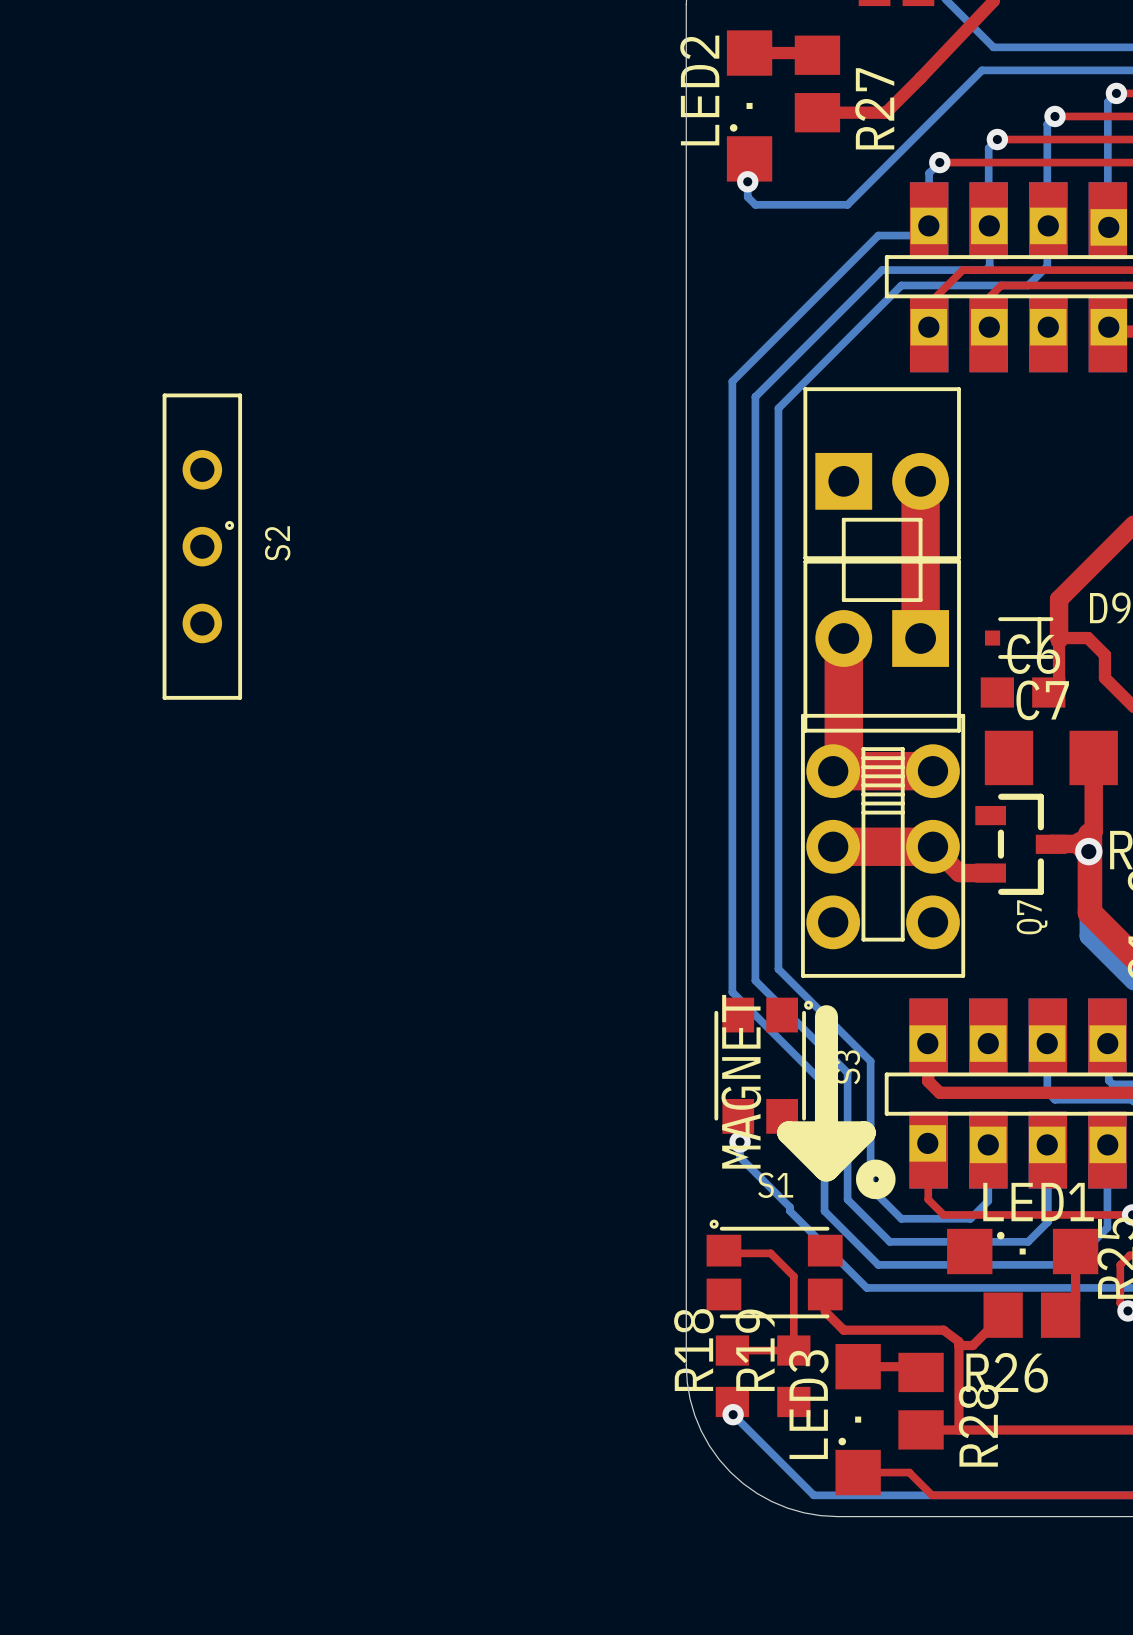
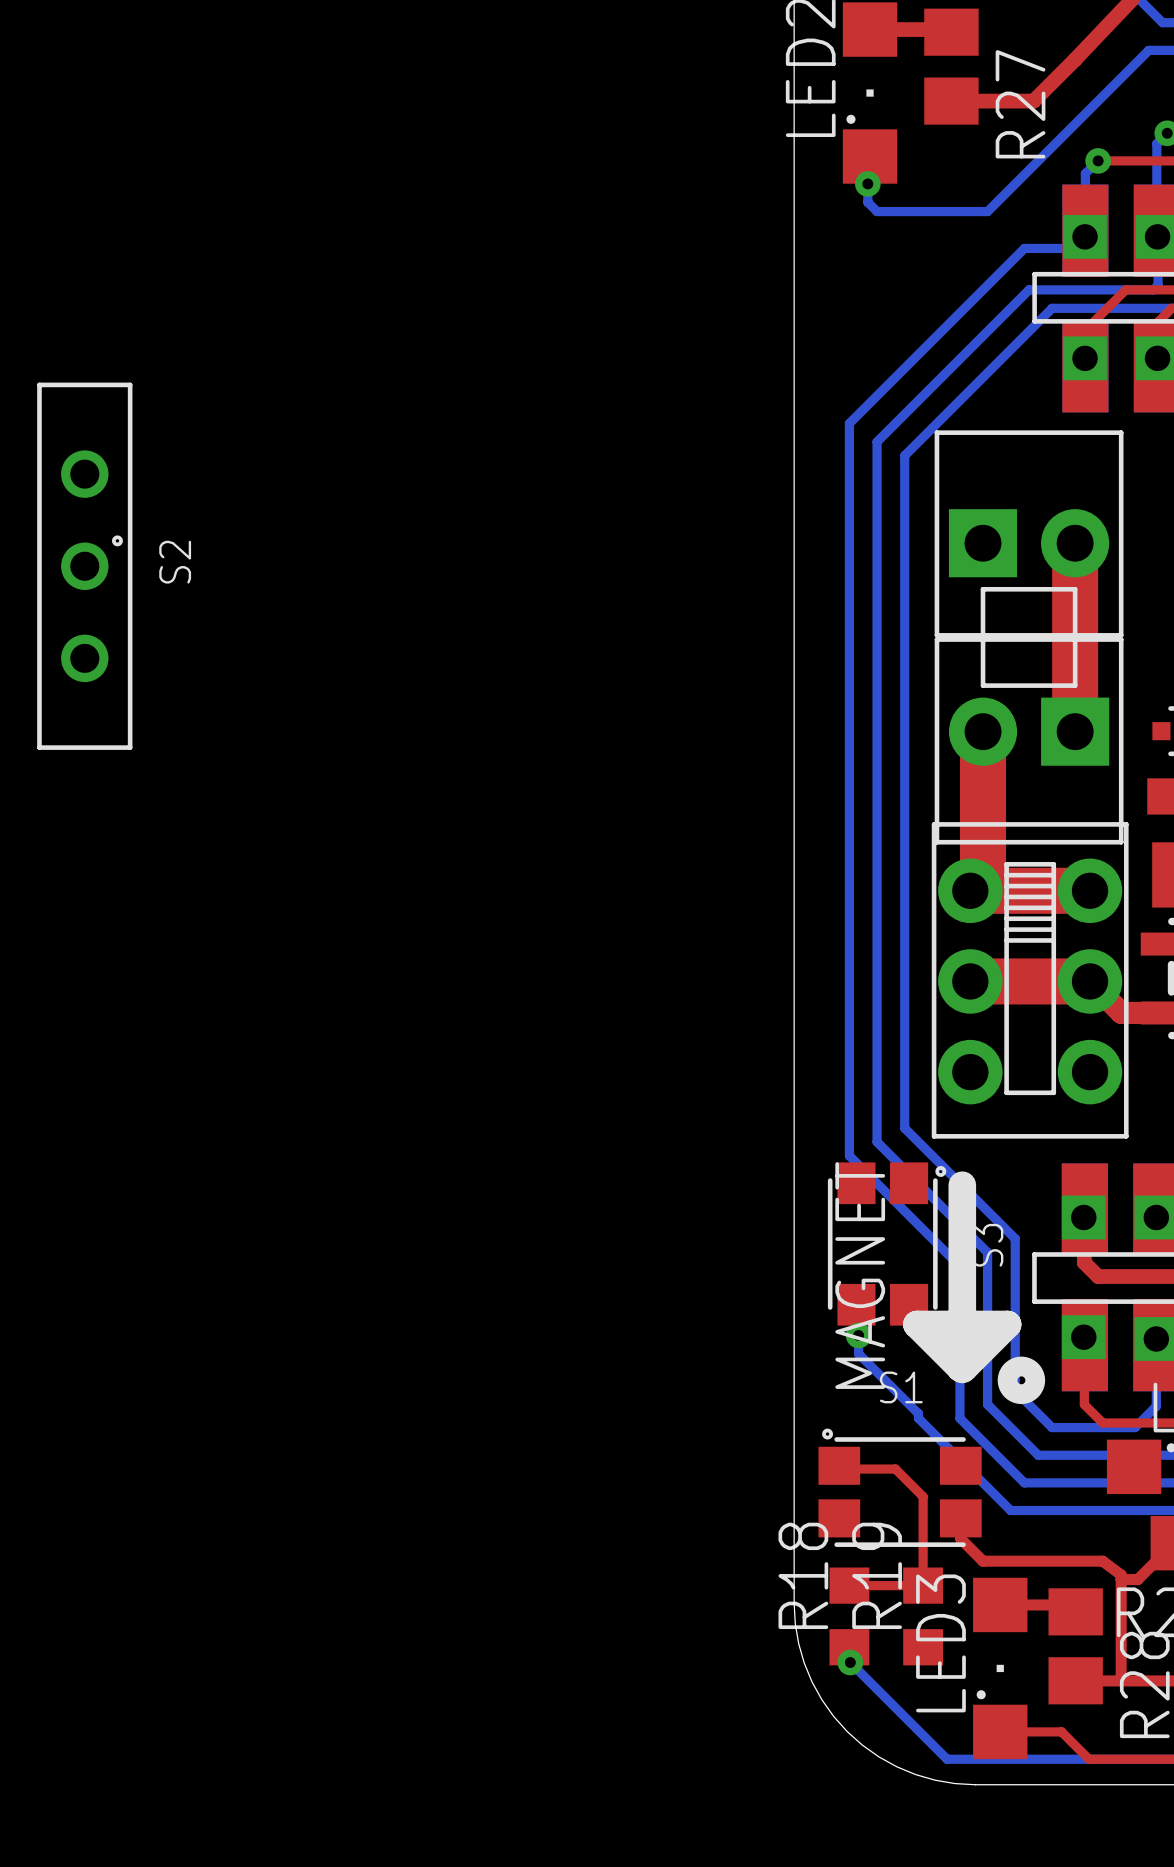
S2 position: (202, 546) -> (84, 566)

